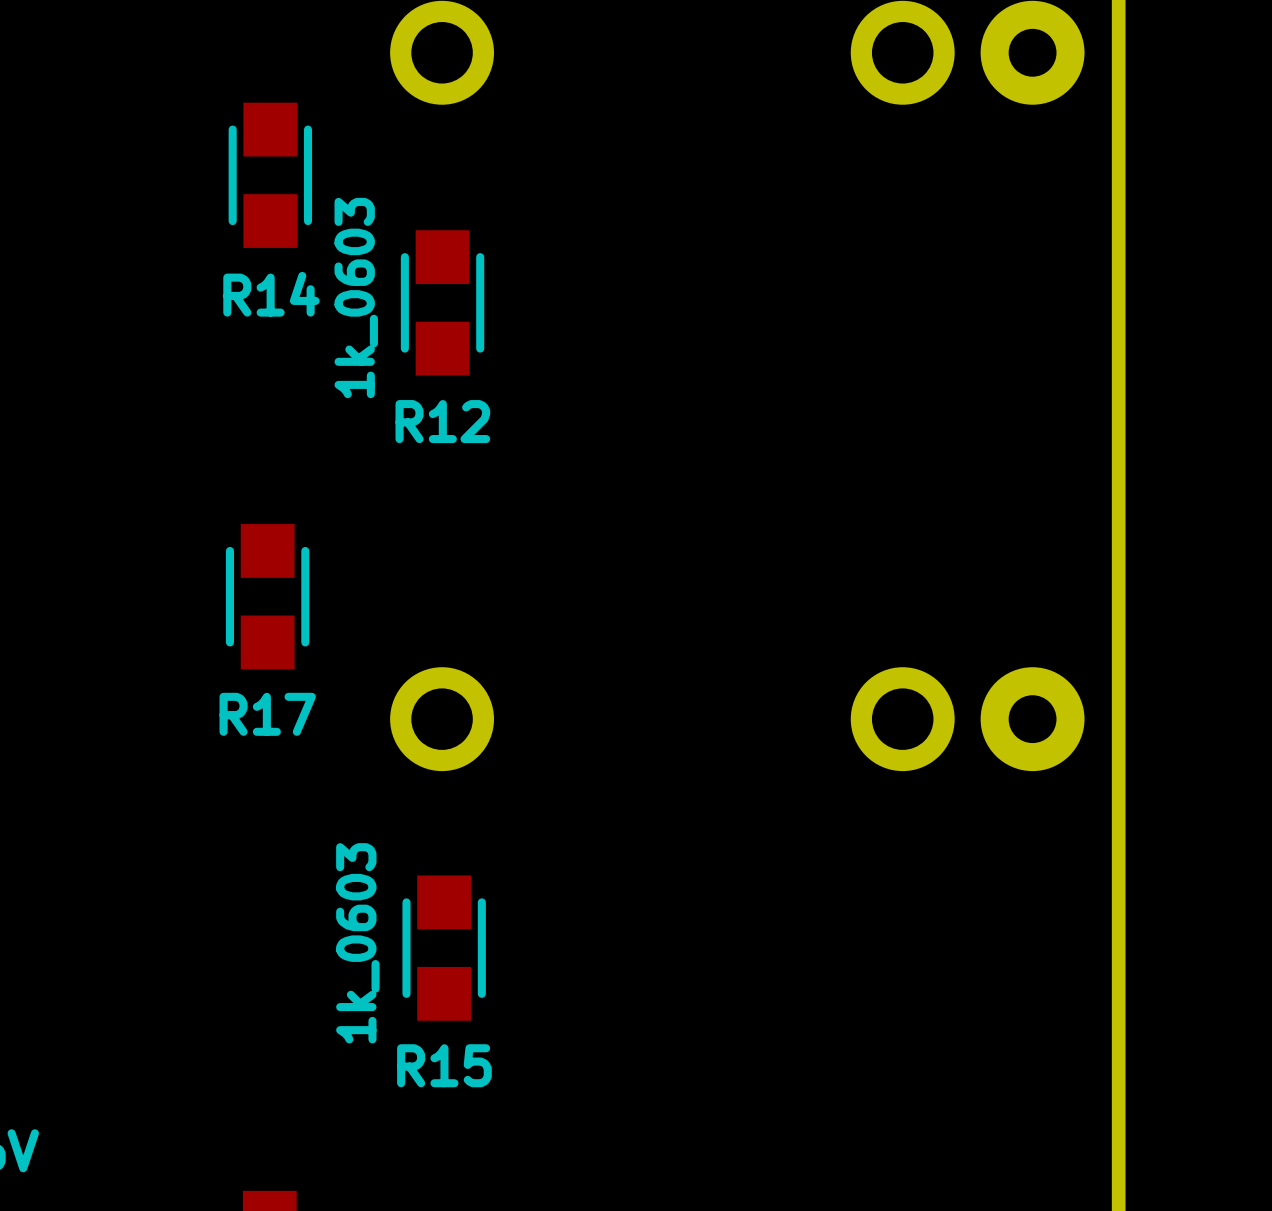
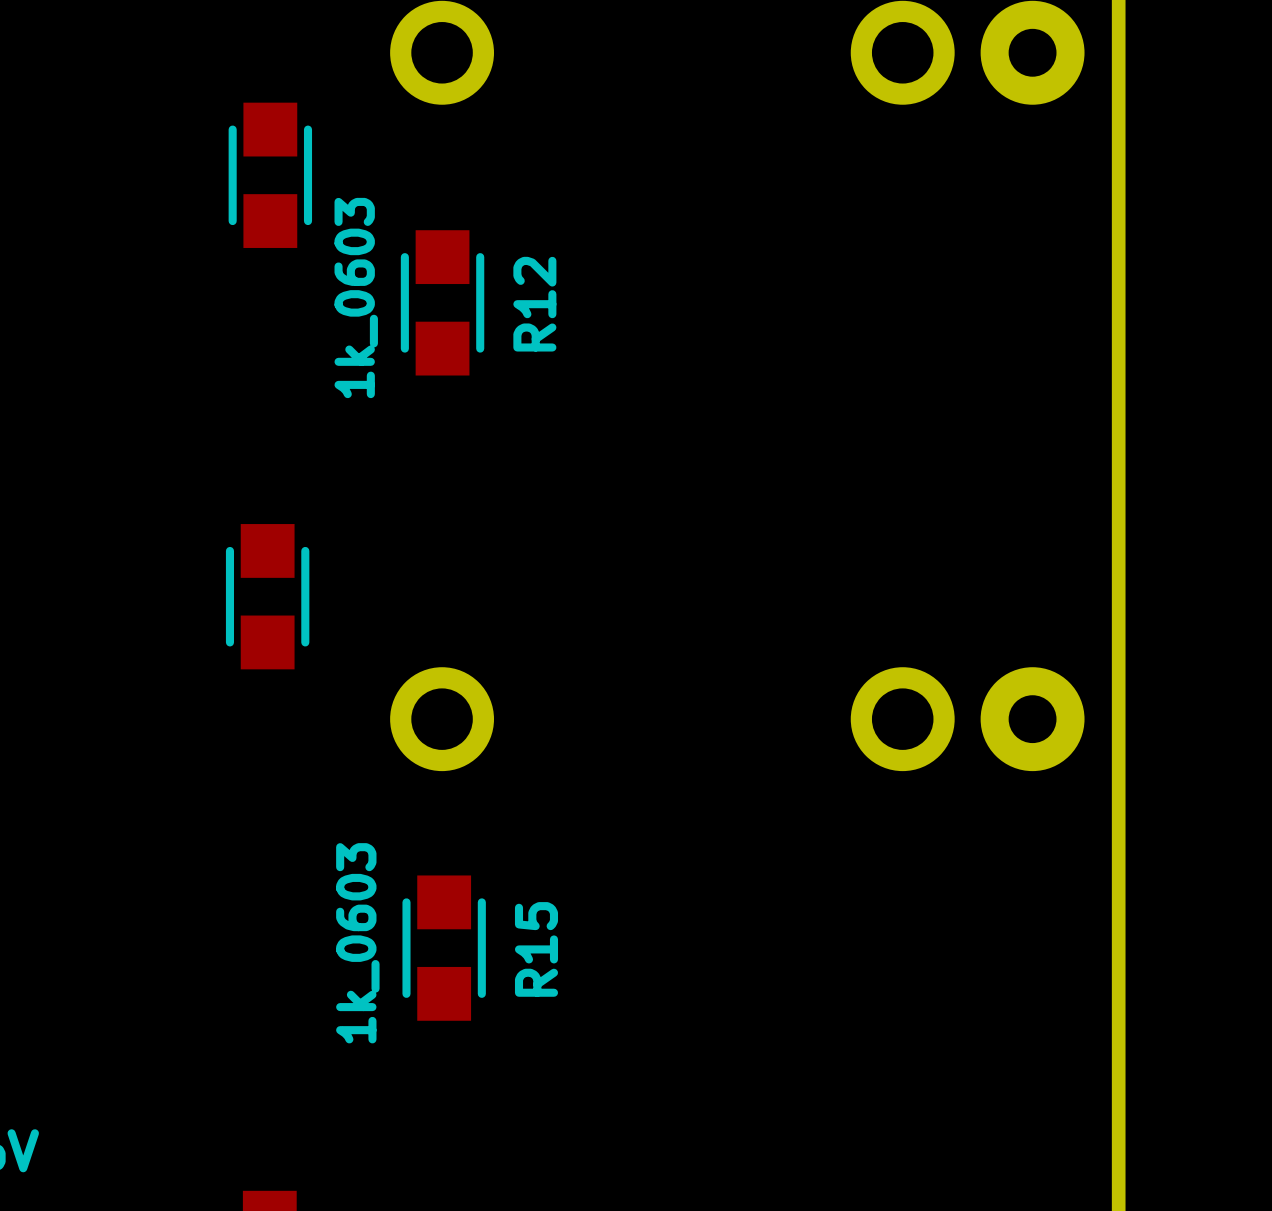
R14 name: R14 (271, 294) -> none
R12 name rotation: 0° (442, 421) -> 90° counterclockwise (534, 304)
R12 name position: R12 (442, 421) -> R12 (534, 304)
R17 name: R17 (267, 714) -> none
R15 name rotation: 0° (444, 1065) -> 90° counterclockwise (536, 949)
R15 name position: R15 (444, 1065) -> R15 (536, 949)

